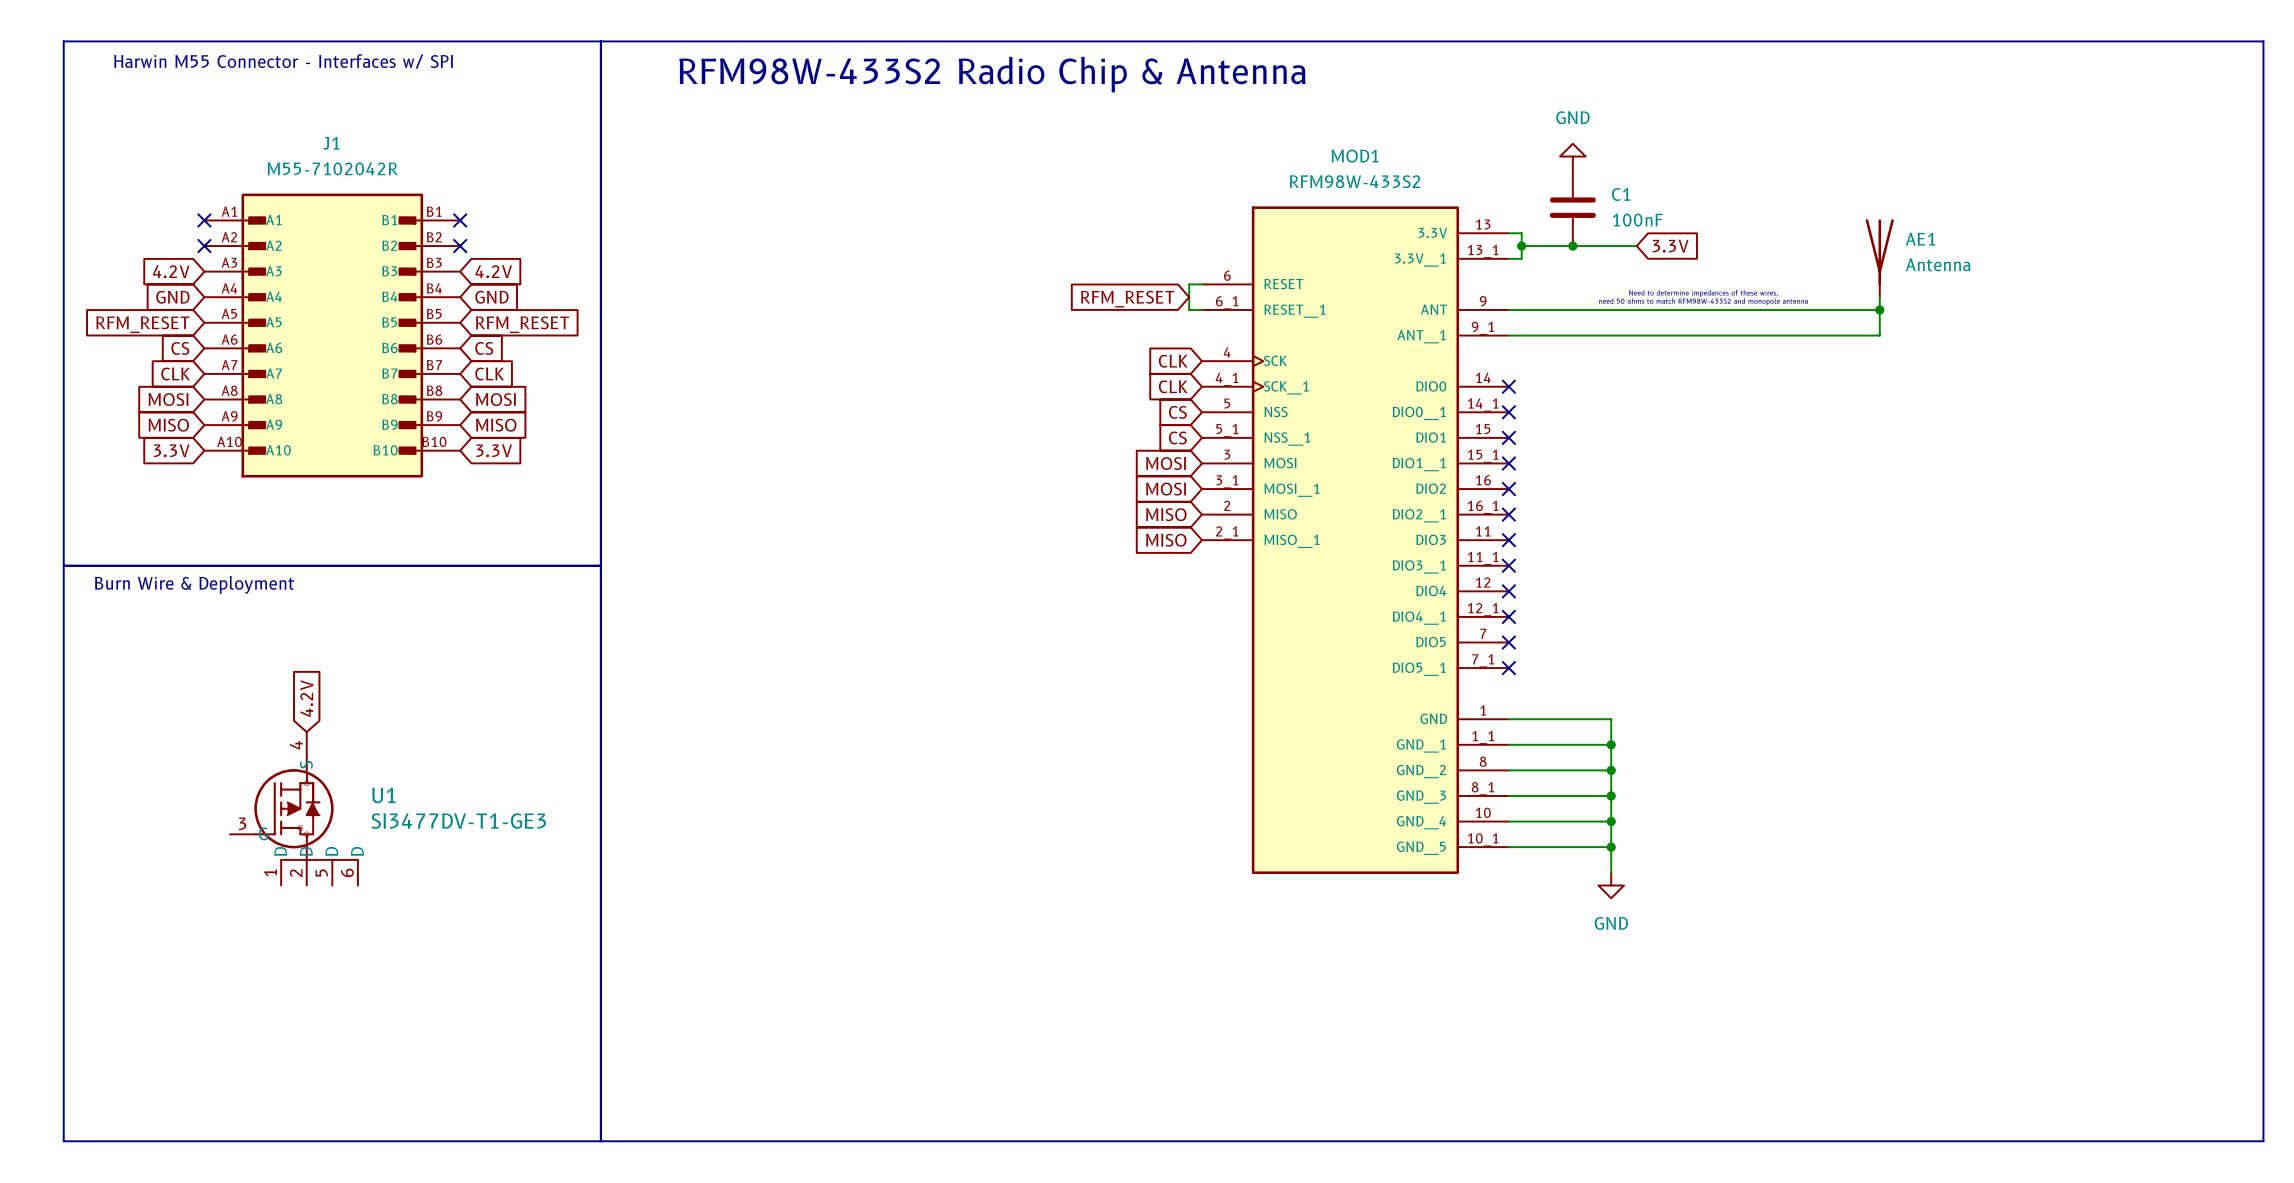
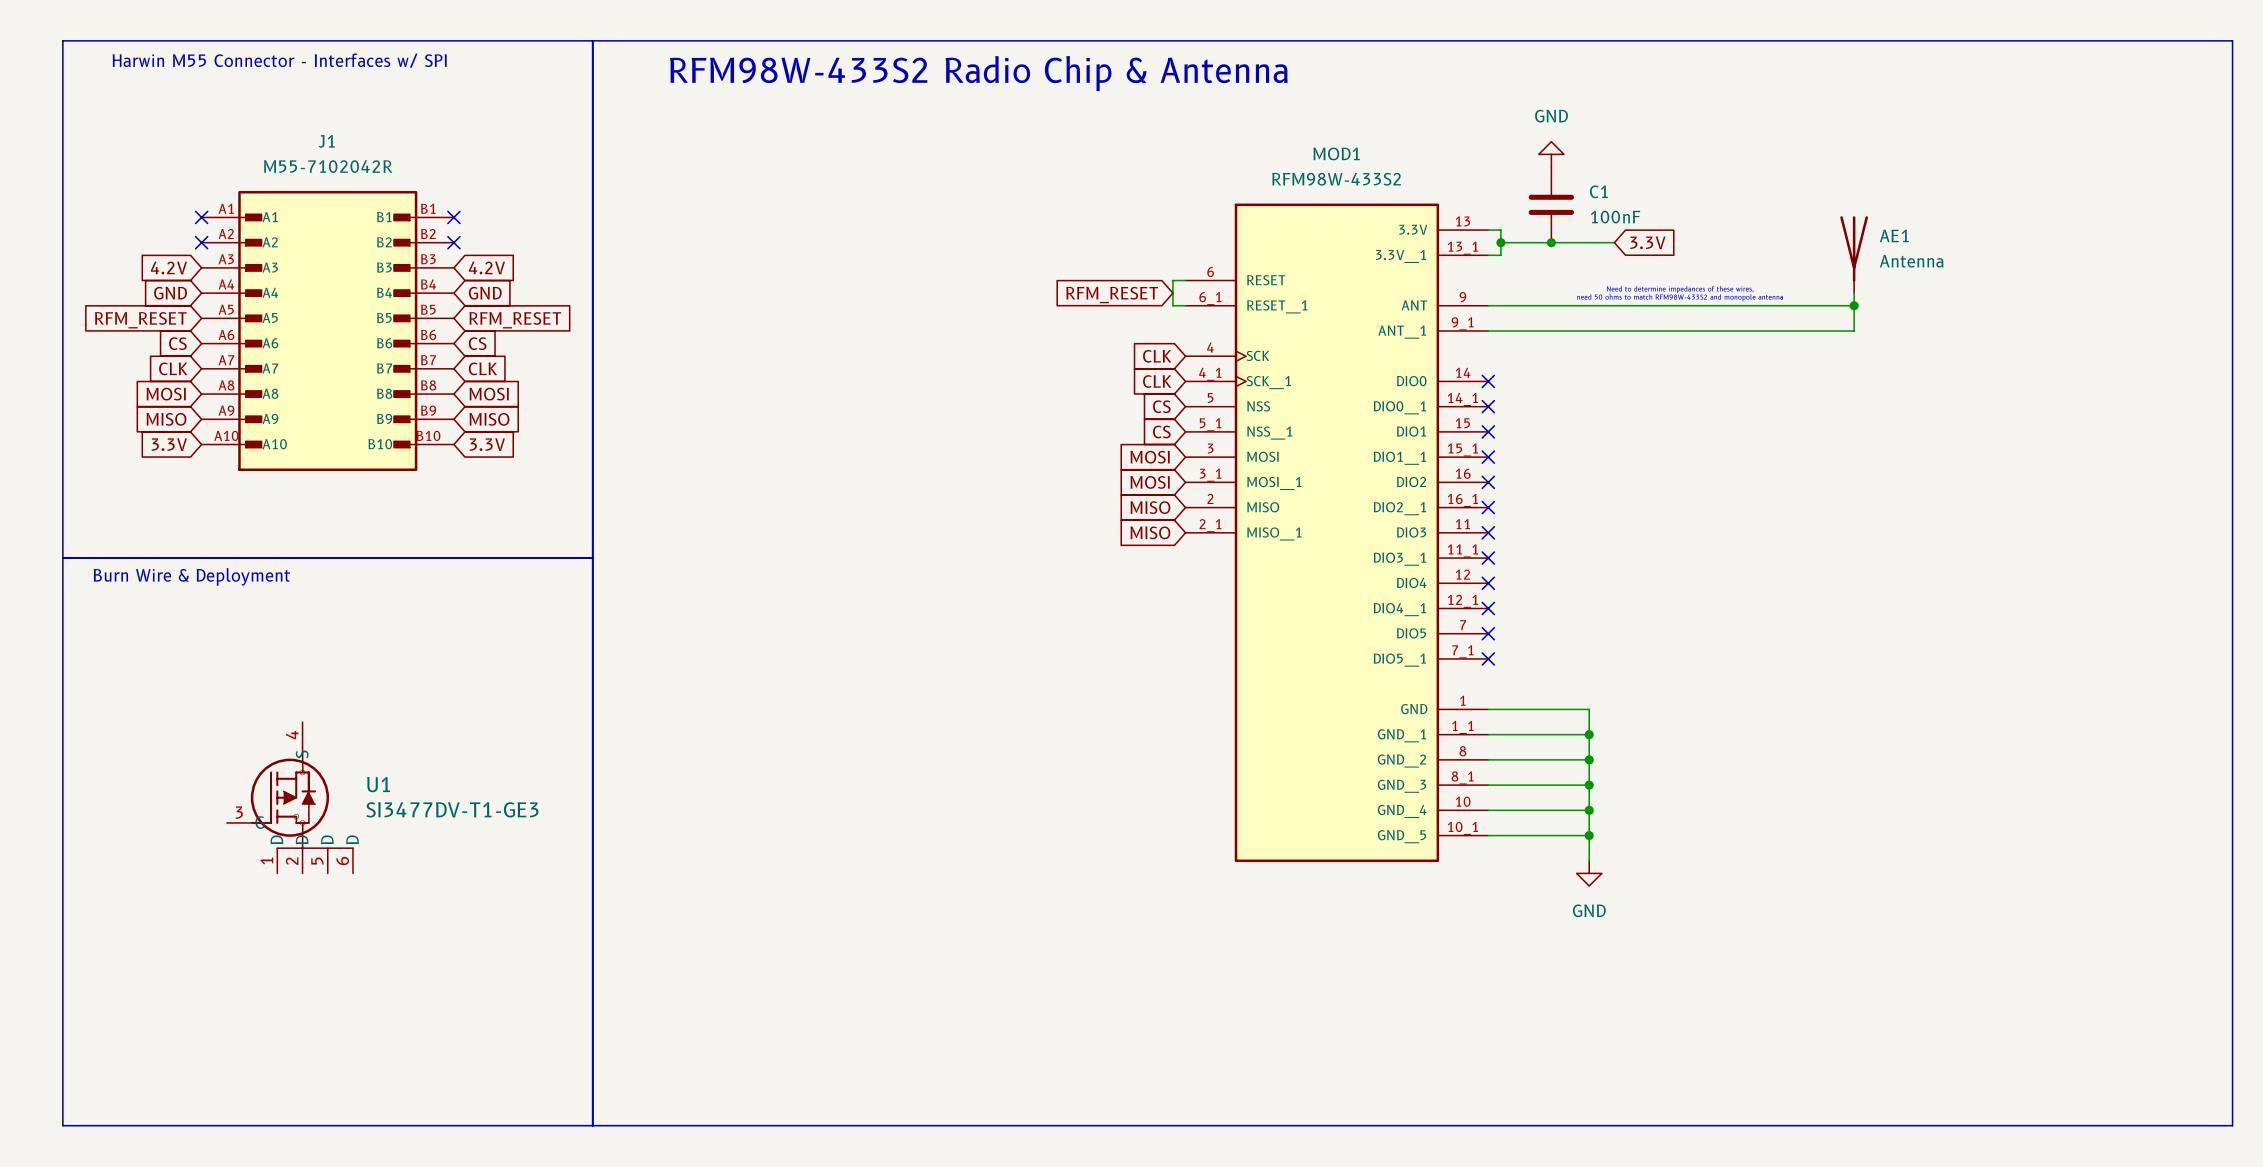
global label: 4.2V (306, 698) -> none

